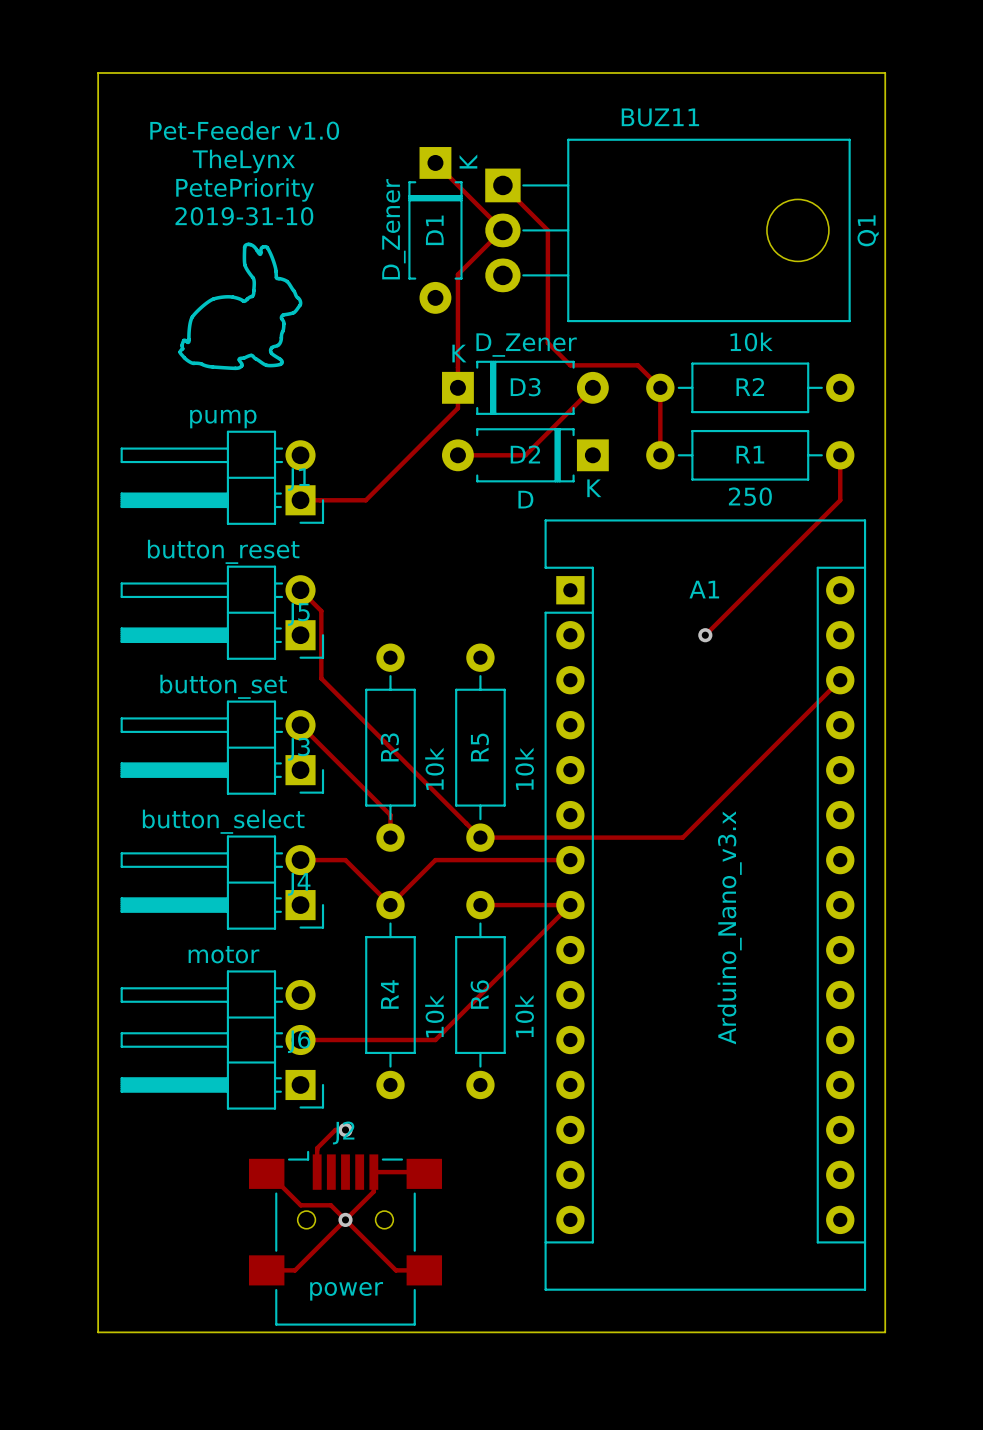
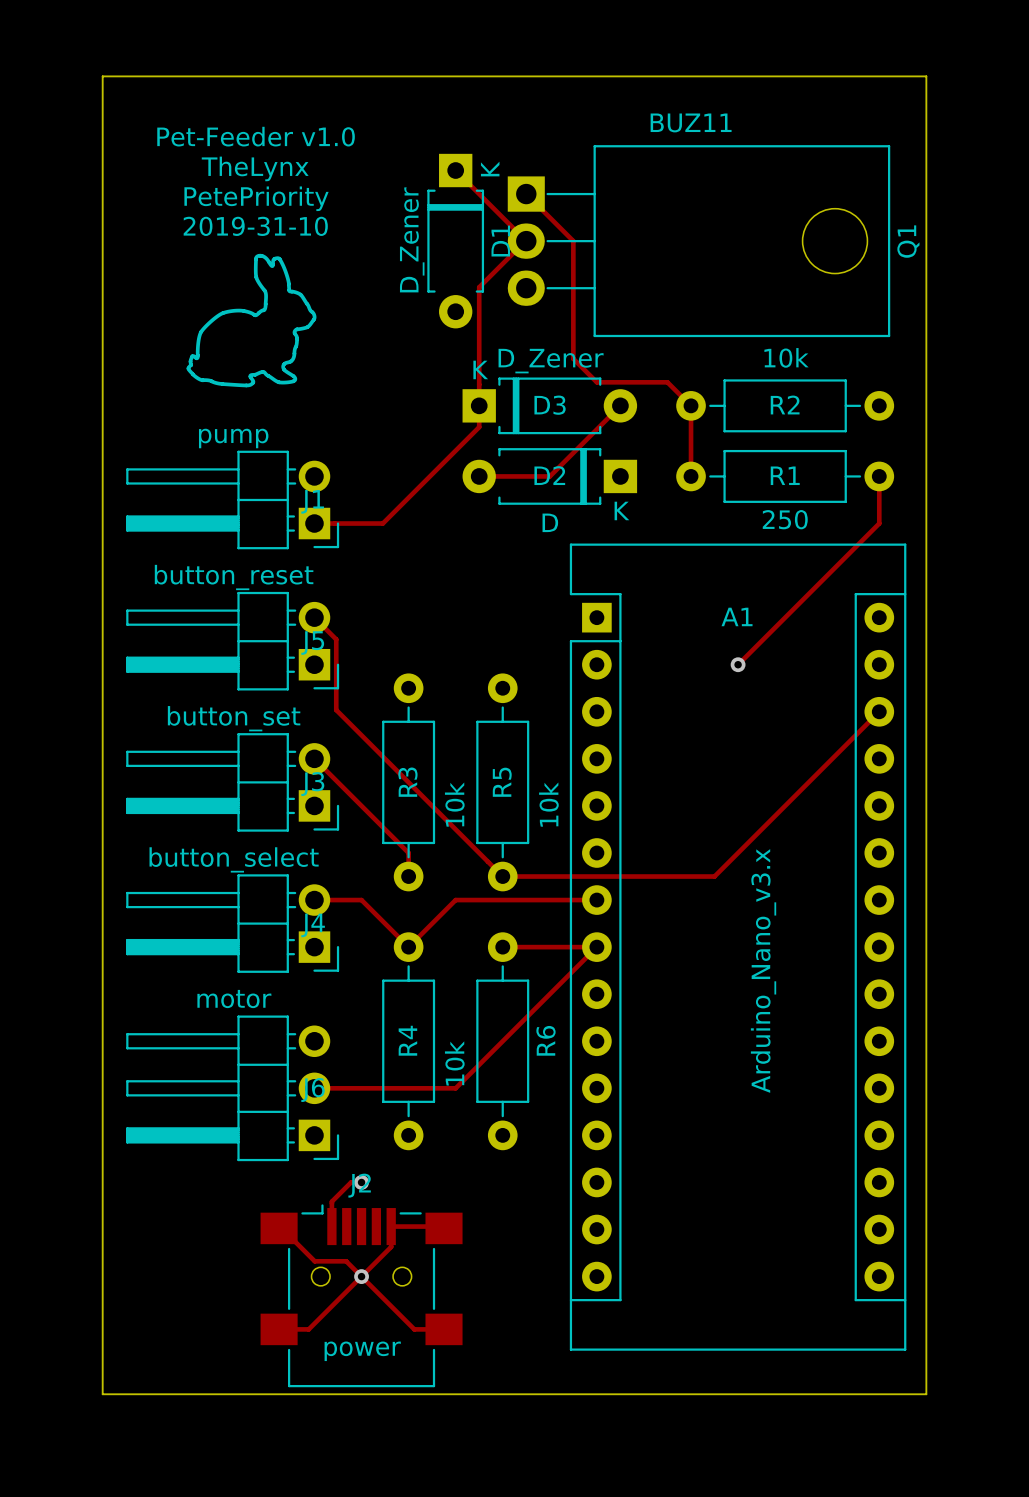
D1 name position: D1 (434, 230) -> D1 (500, 241)
R6 name position: R6 (479, 994) -> R6 (545, 1040)
R6 value: 10k (524, 1016) -> none

